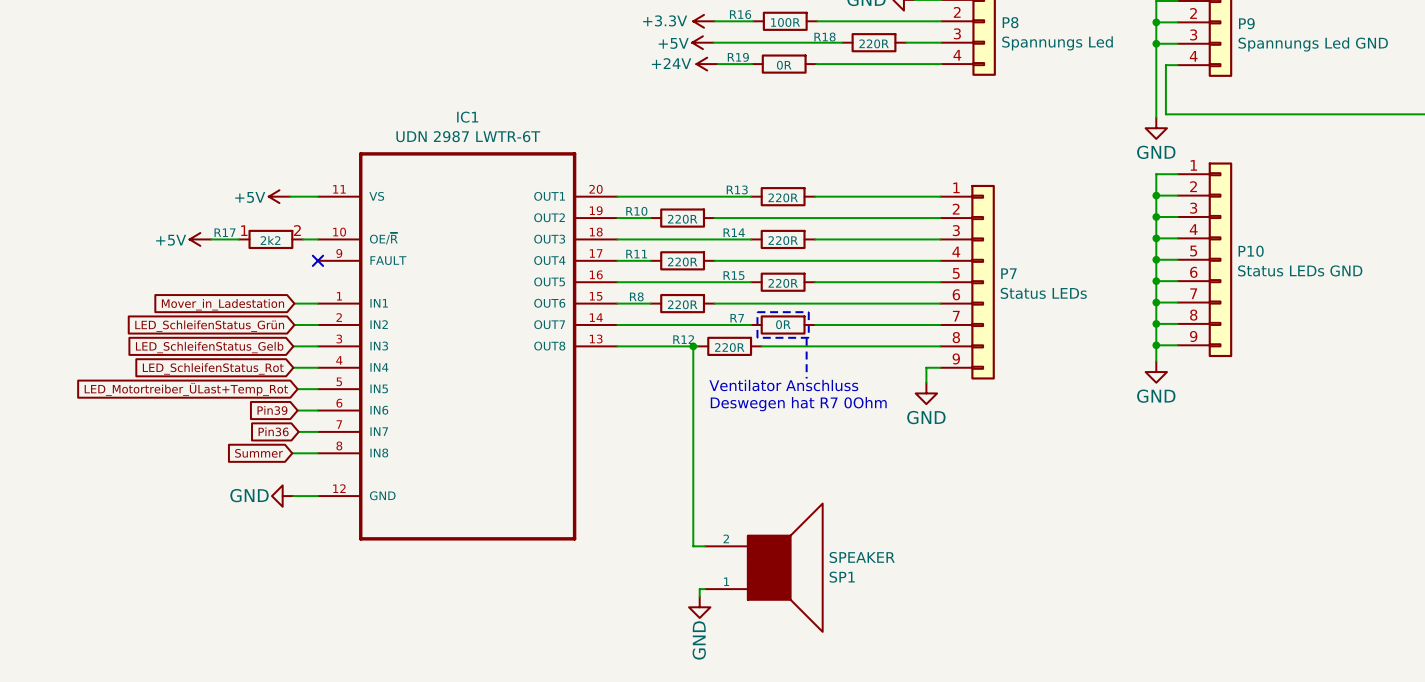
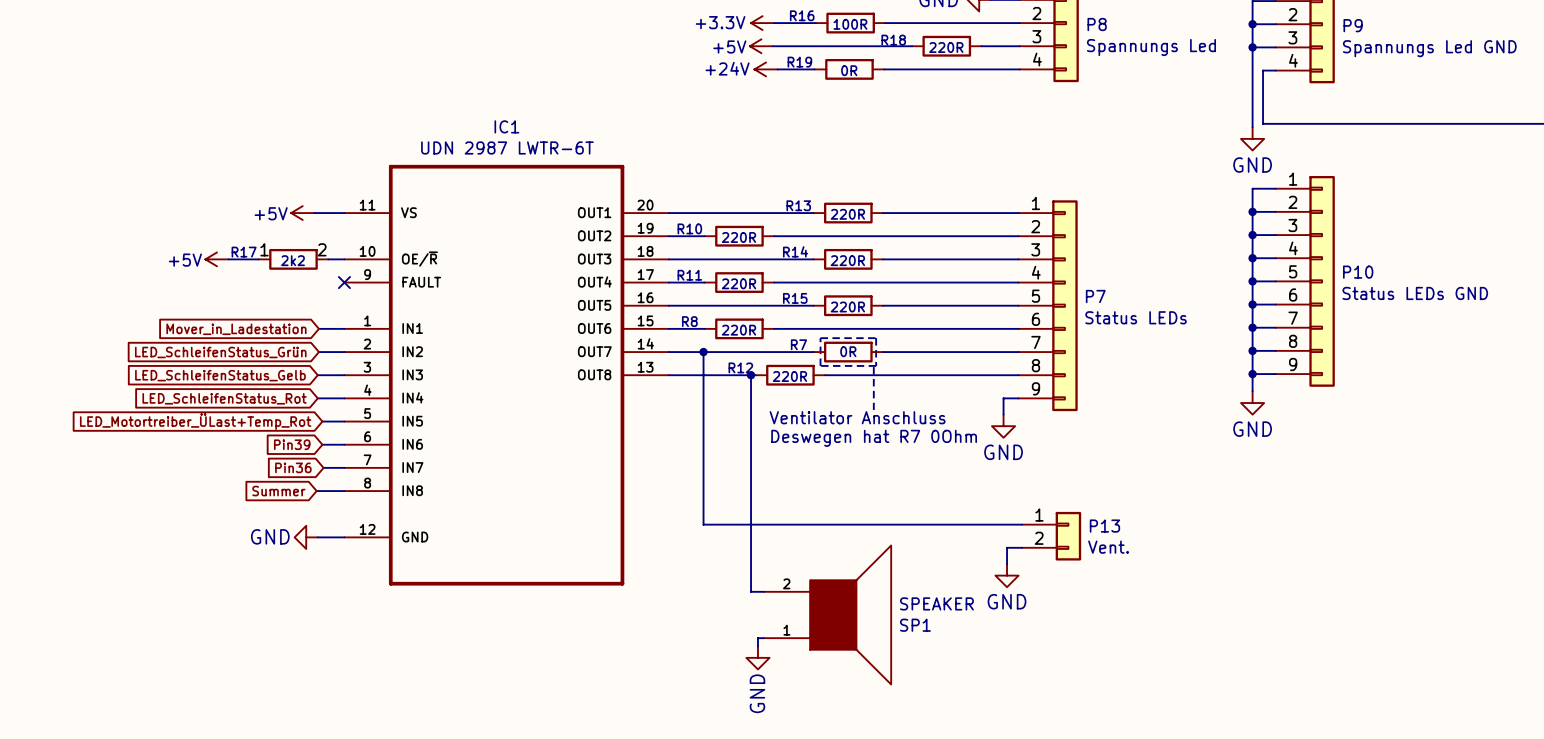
wire: none -> (703, 352) (703, 524) (1022, 524)
junction: none -> (703, 352)
P13: none -> Vent. (1051, 536)
wire: none -> (1022, 547) (1007, 547) (1007, 564)
power symbol: none -> GND (1007, 575)

